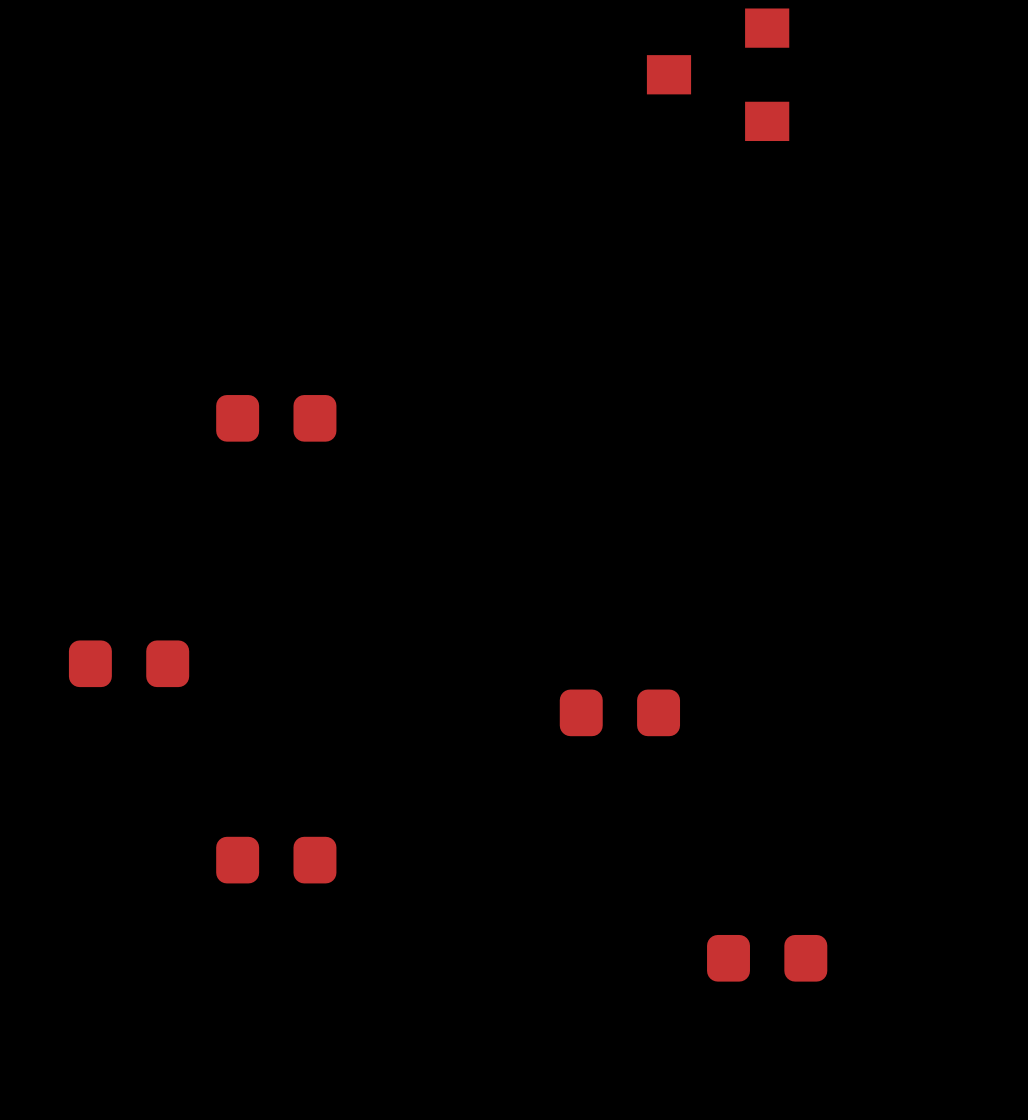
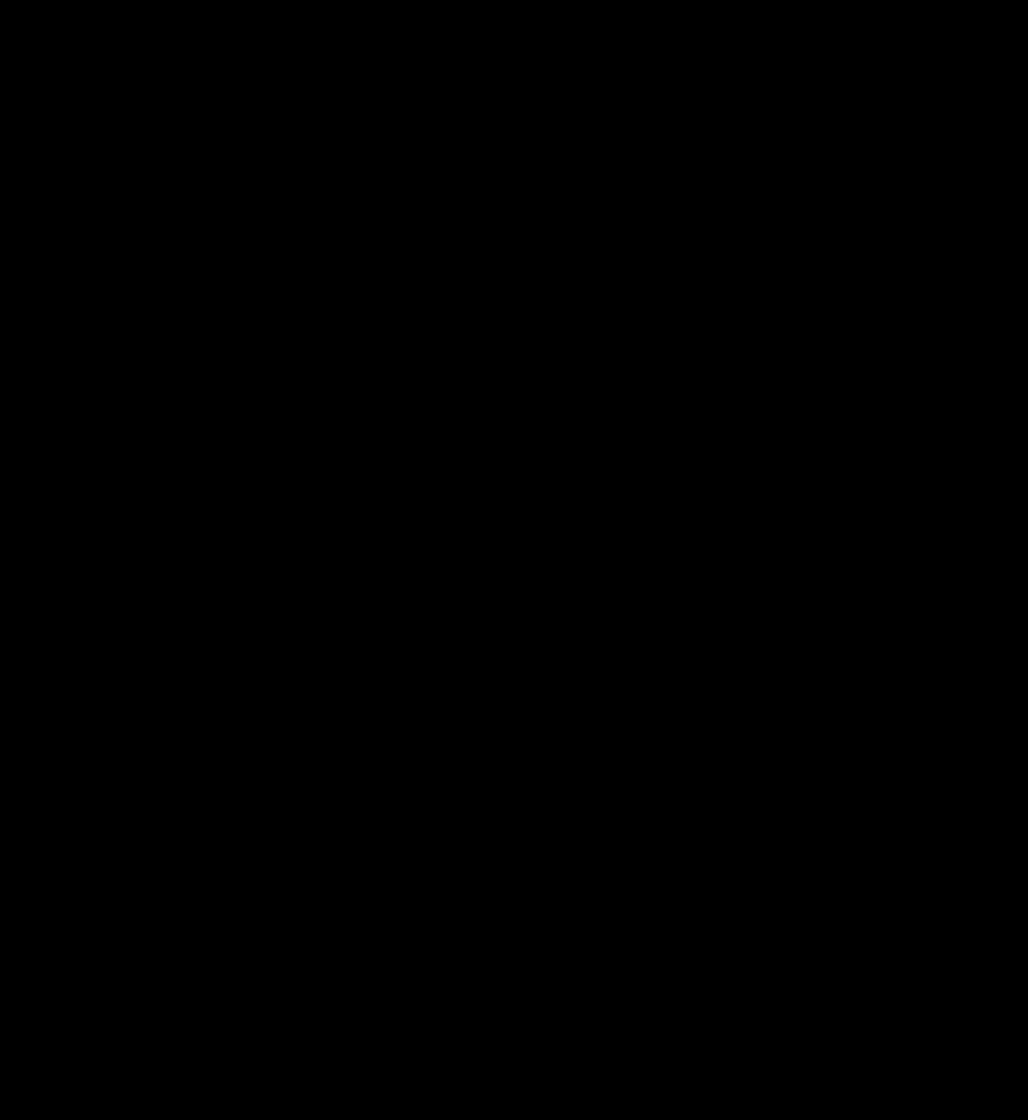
part: (718, 74) -> none
part: (276, 418) -> none
part: (129, 663) -> none
part: (619, 712) -> none
part: (276, 860) -> none
part: (767, 958) -> none

